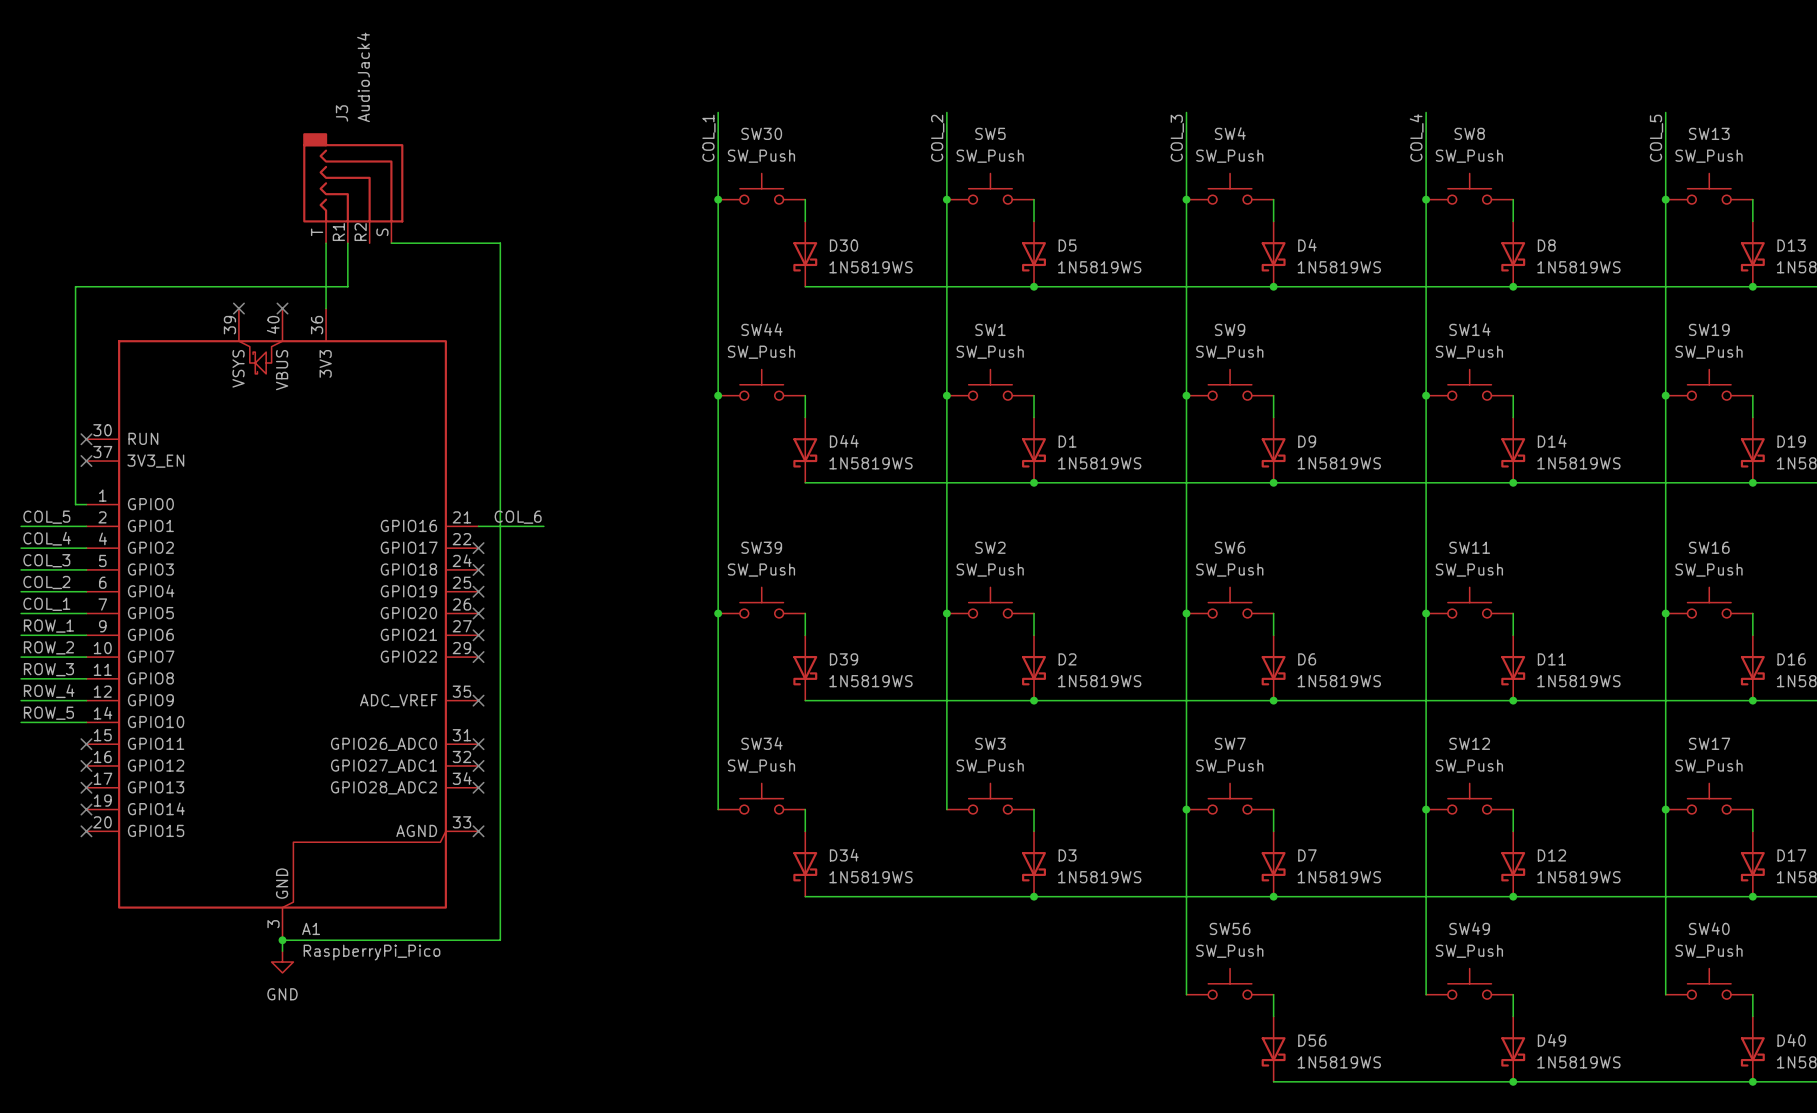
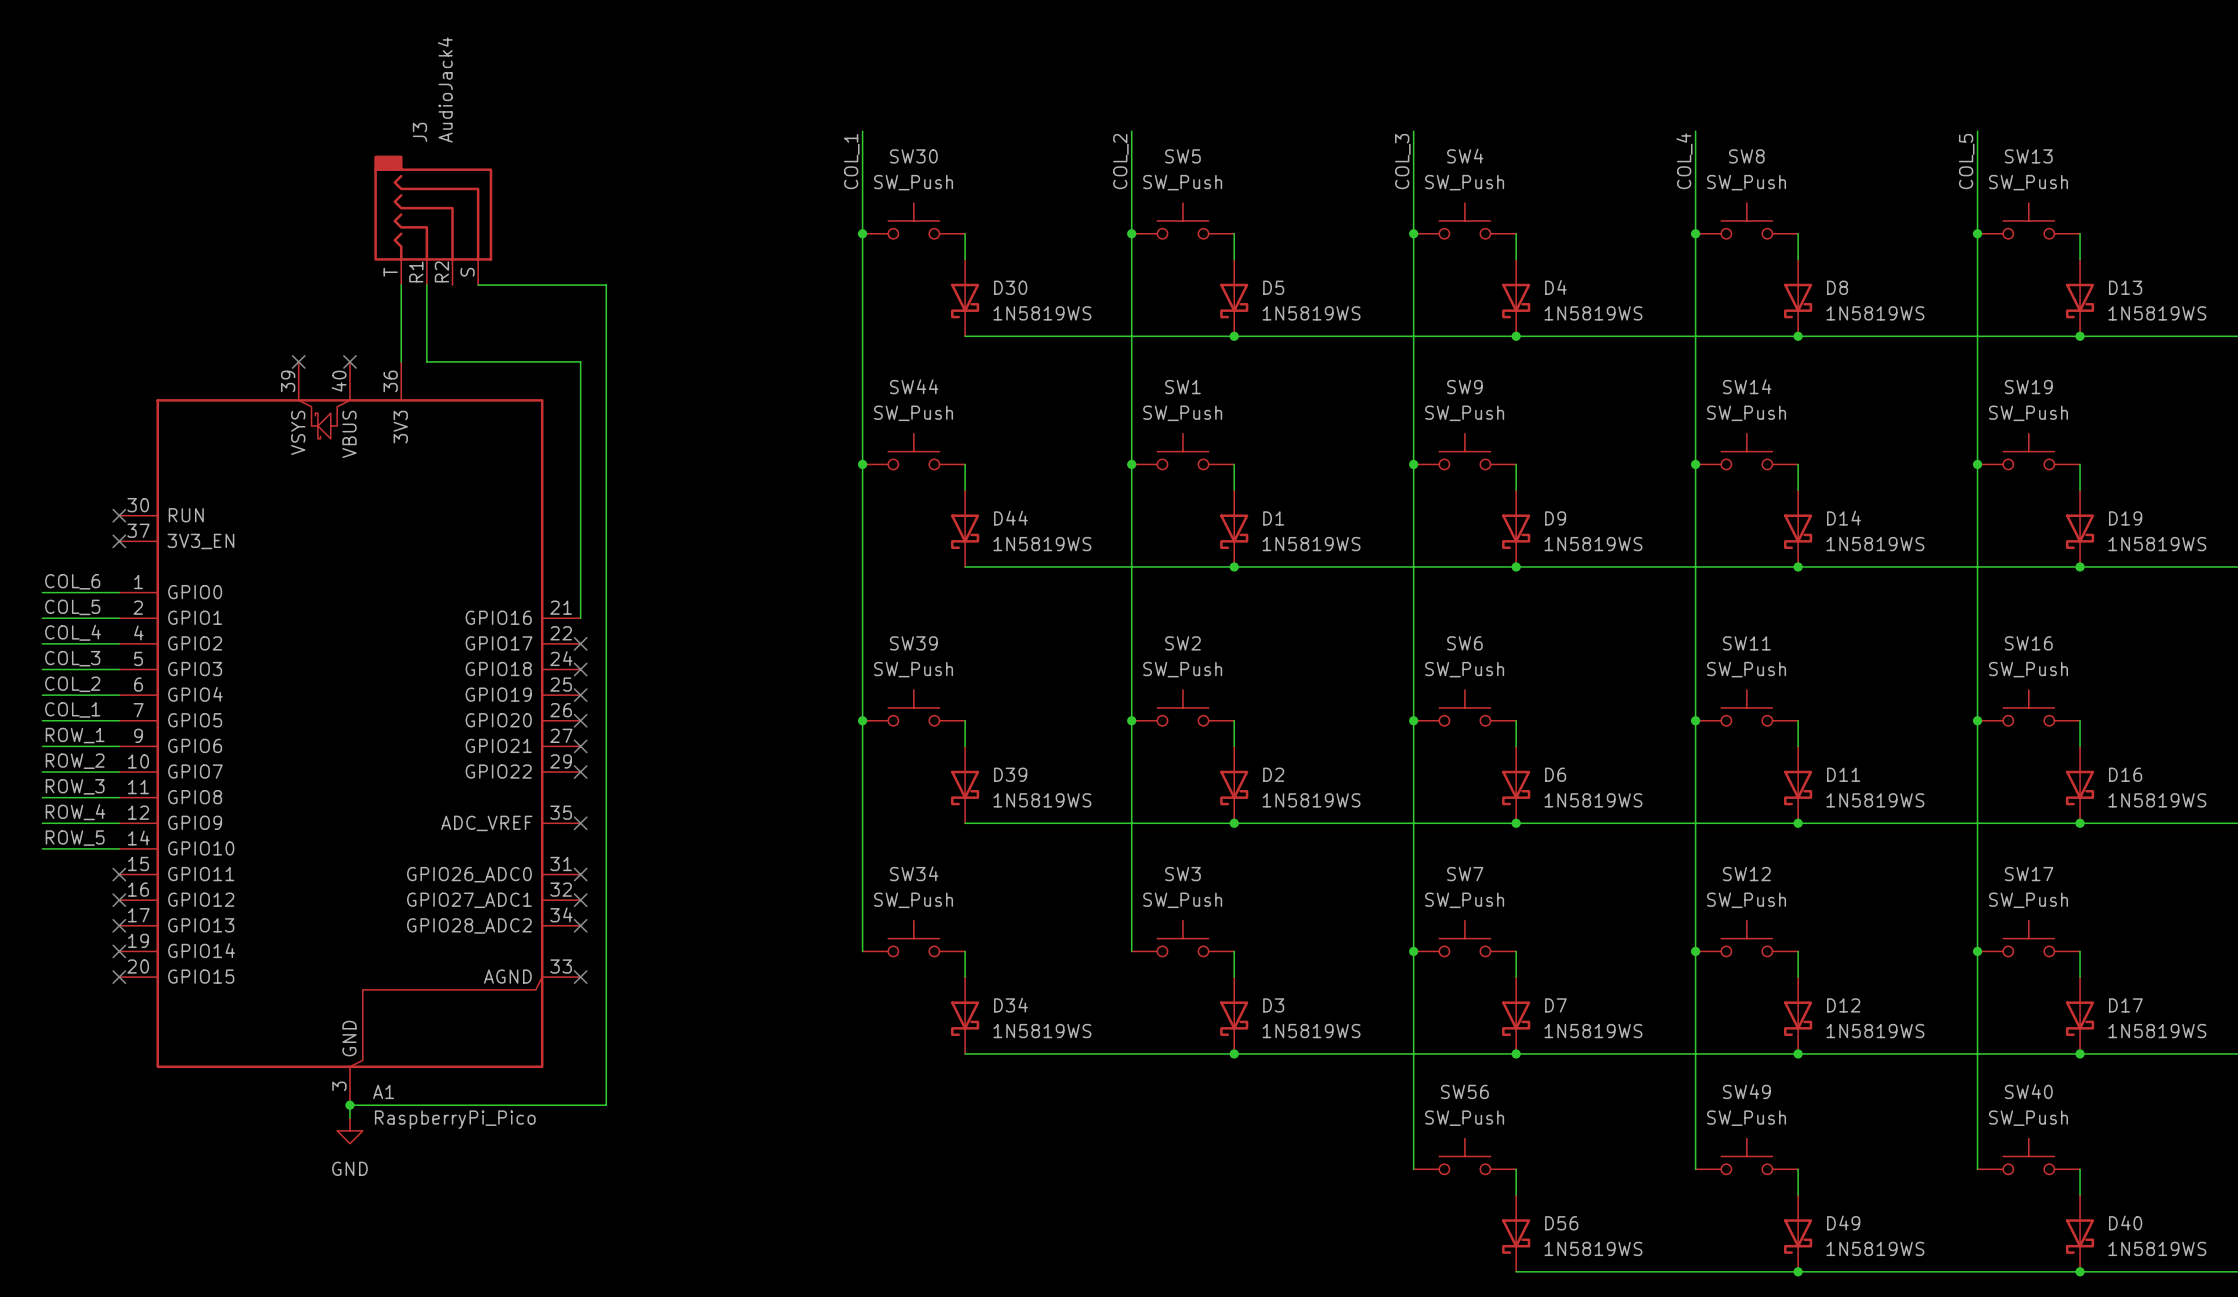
wire: (347, 286) (75, 286) (75, 504) -> (42, 592) (106, 592)
label: none -> COL_6 (72, 581)
label: COL_6 (518, 517) -> none
wire: (478, 526) (543, 526) -> (580, 618) (580, 361) (426, 361) (426, 336)

